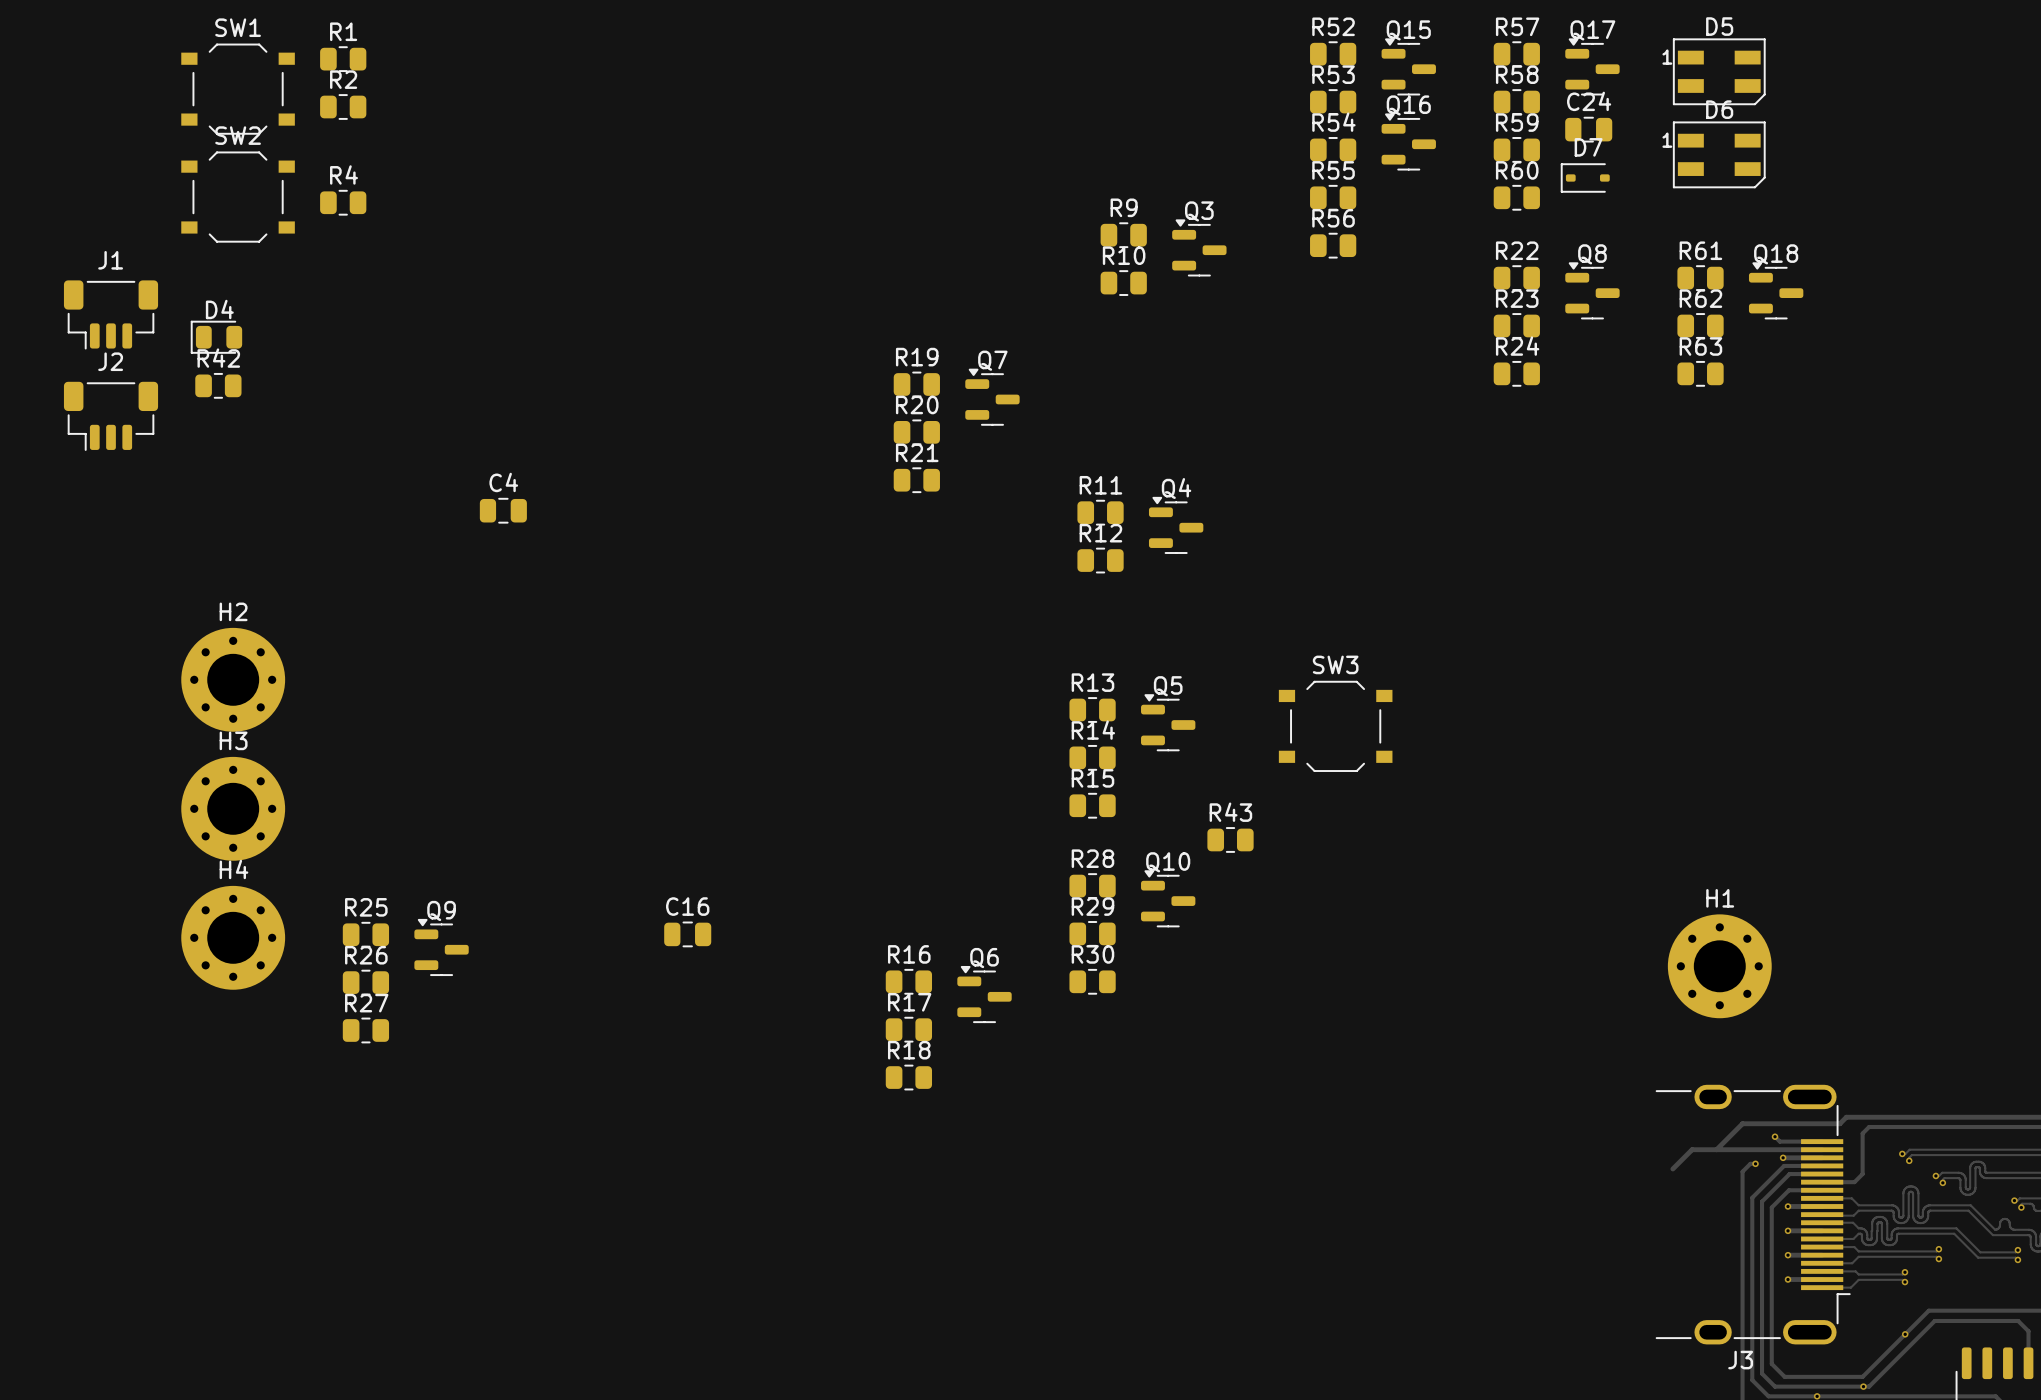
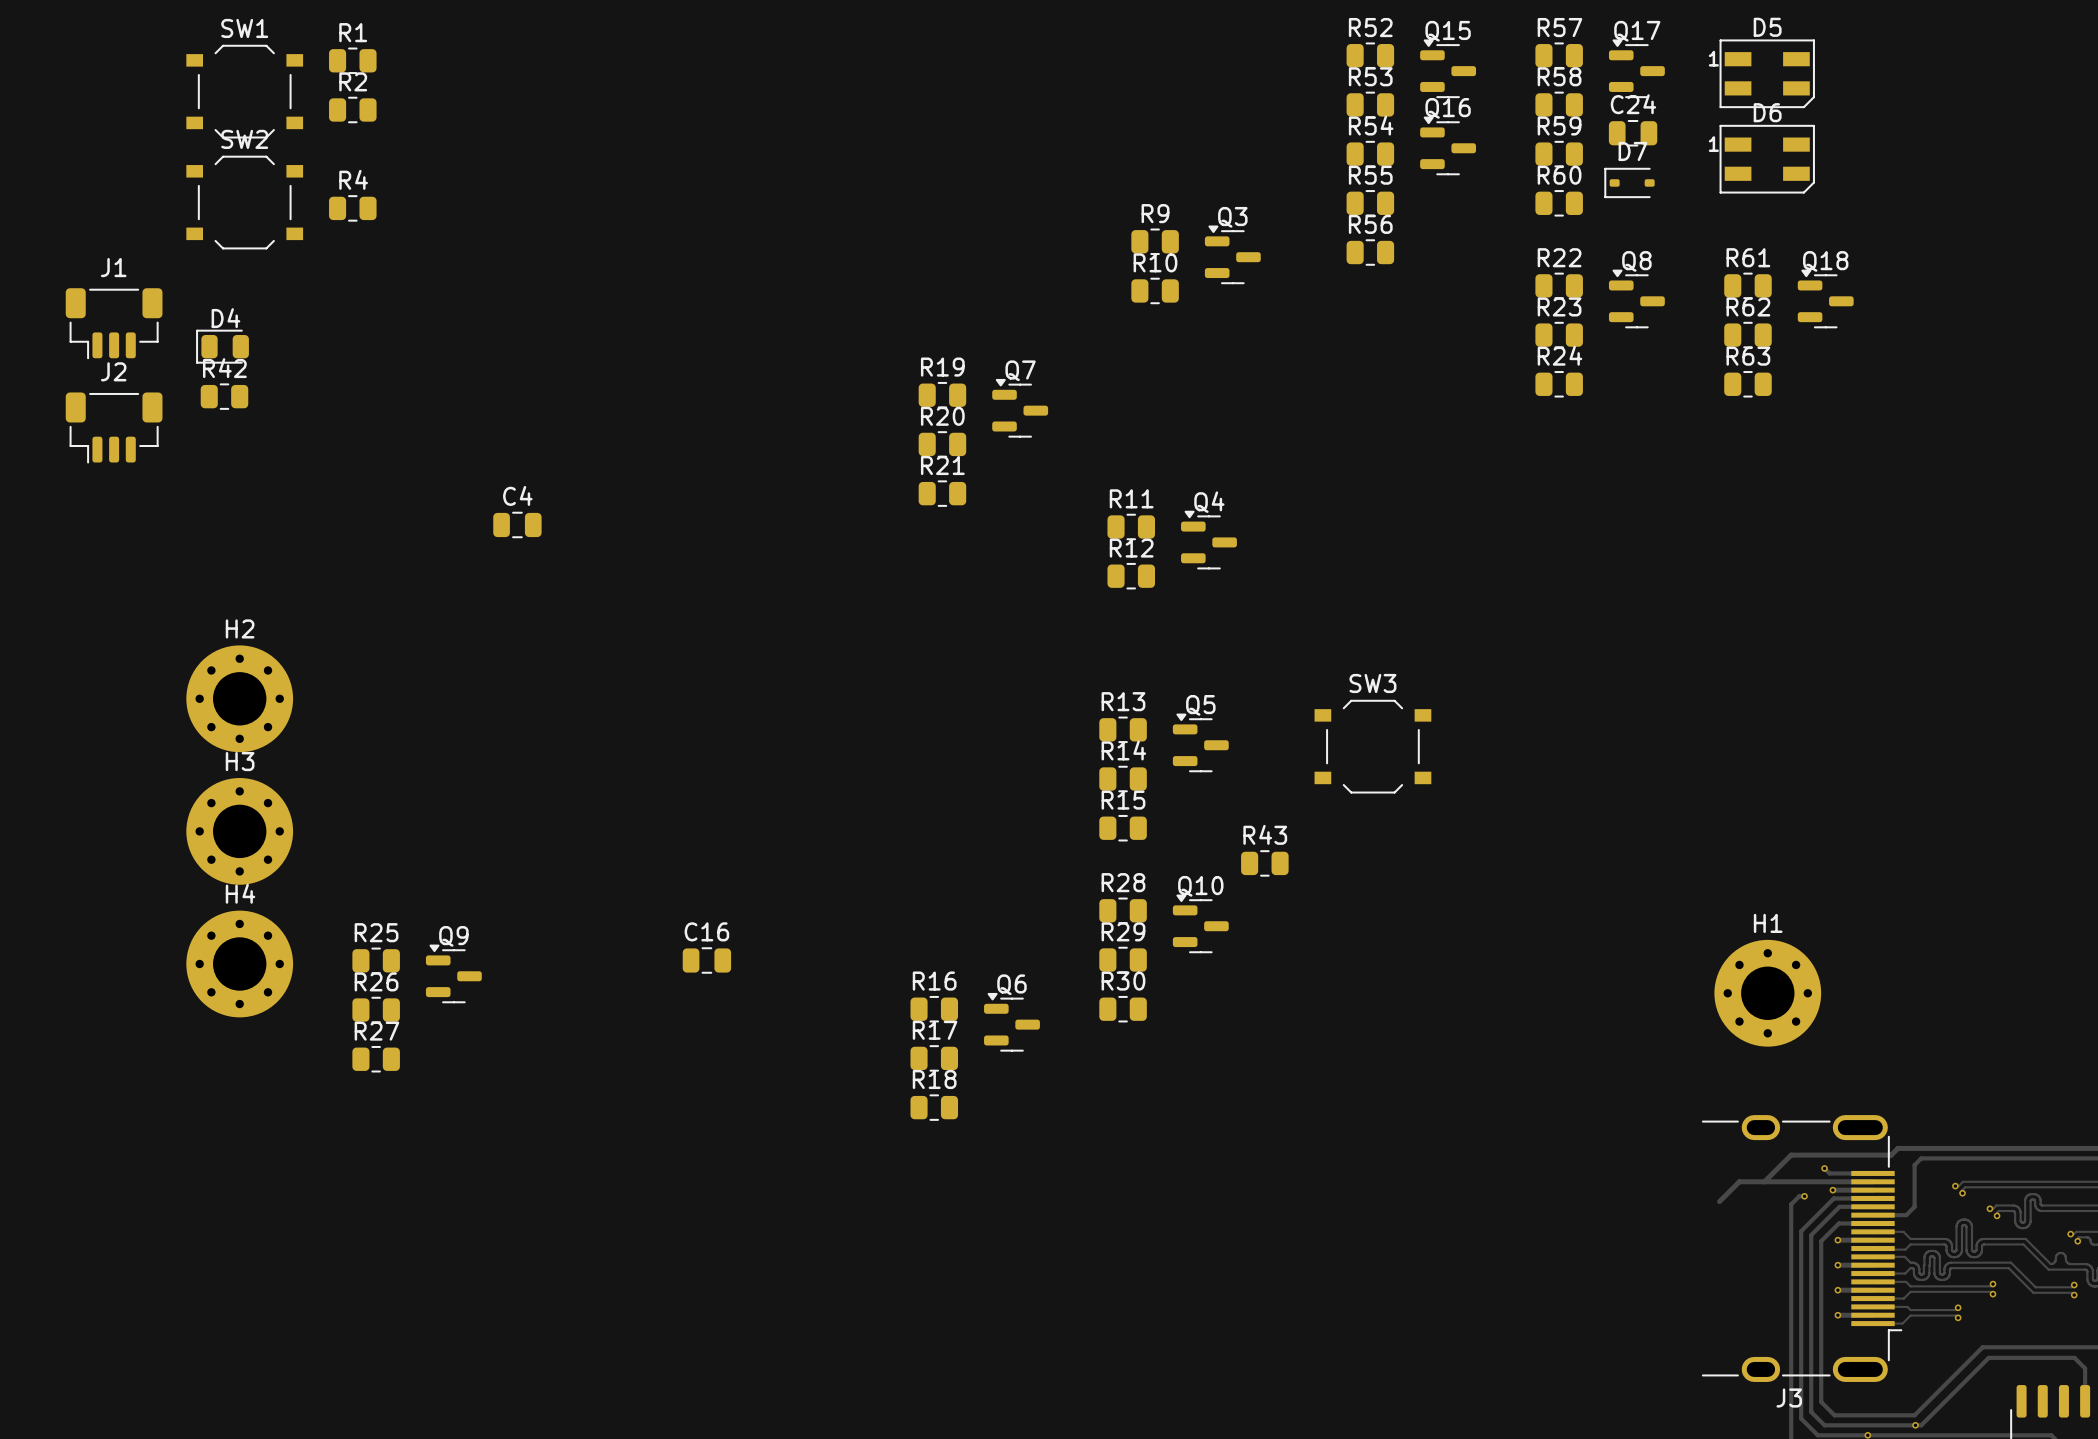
via: (1905, 1334) -> none

